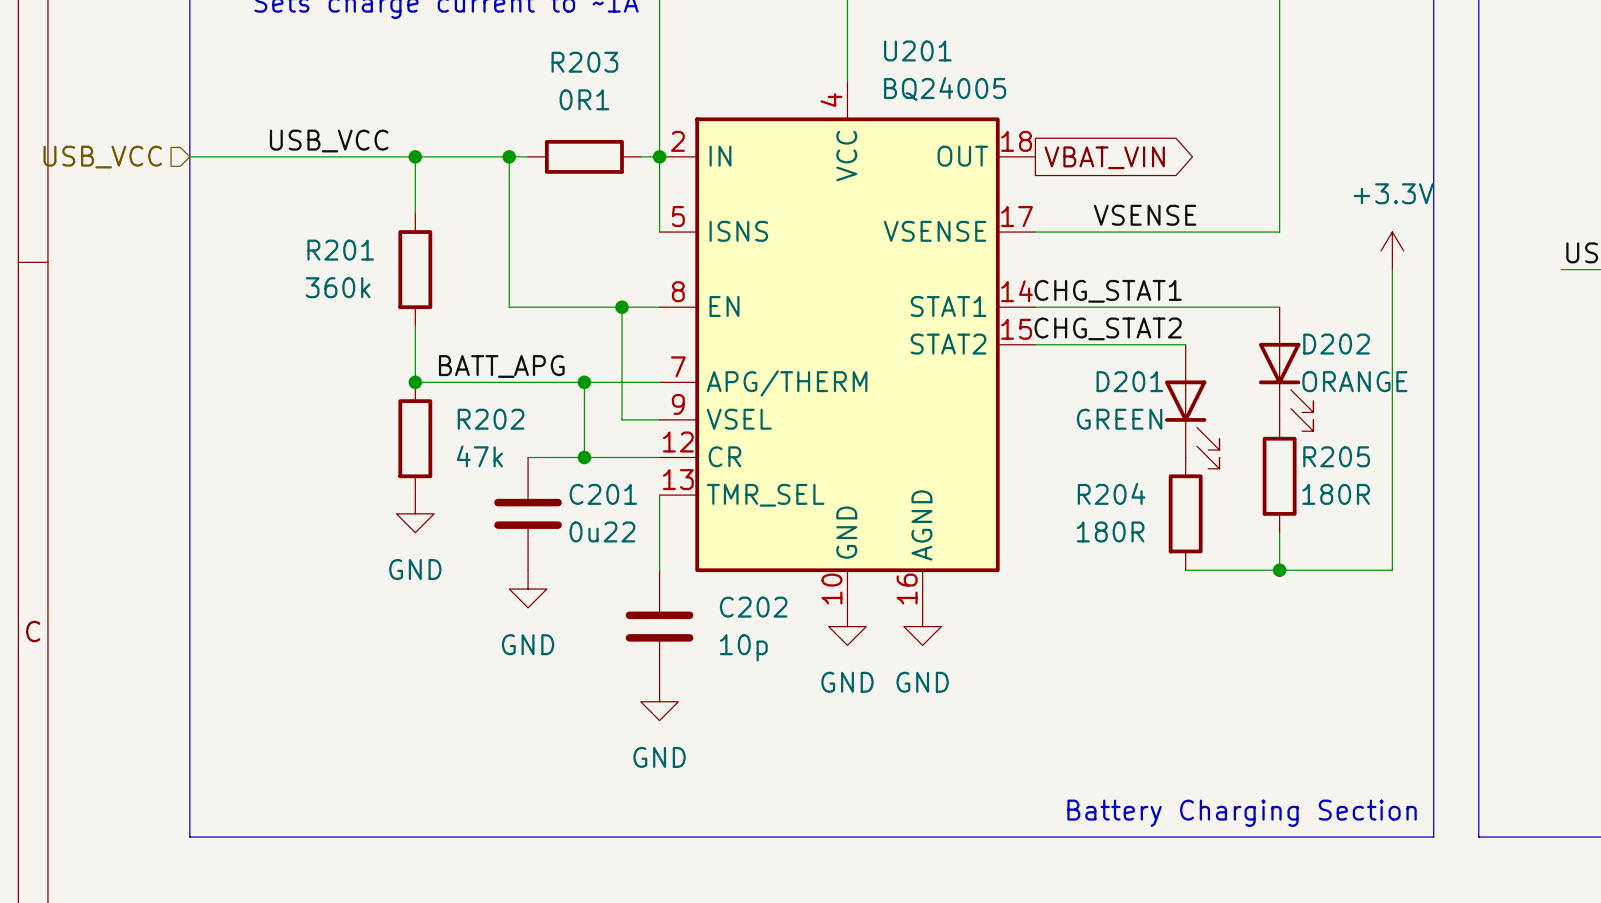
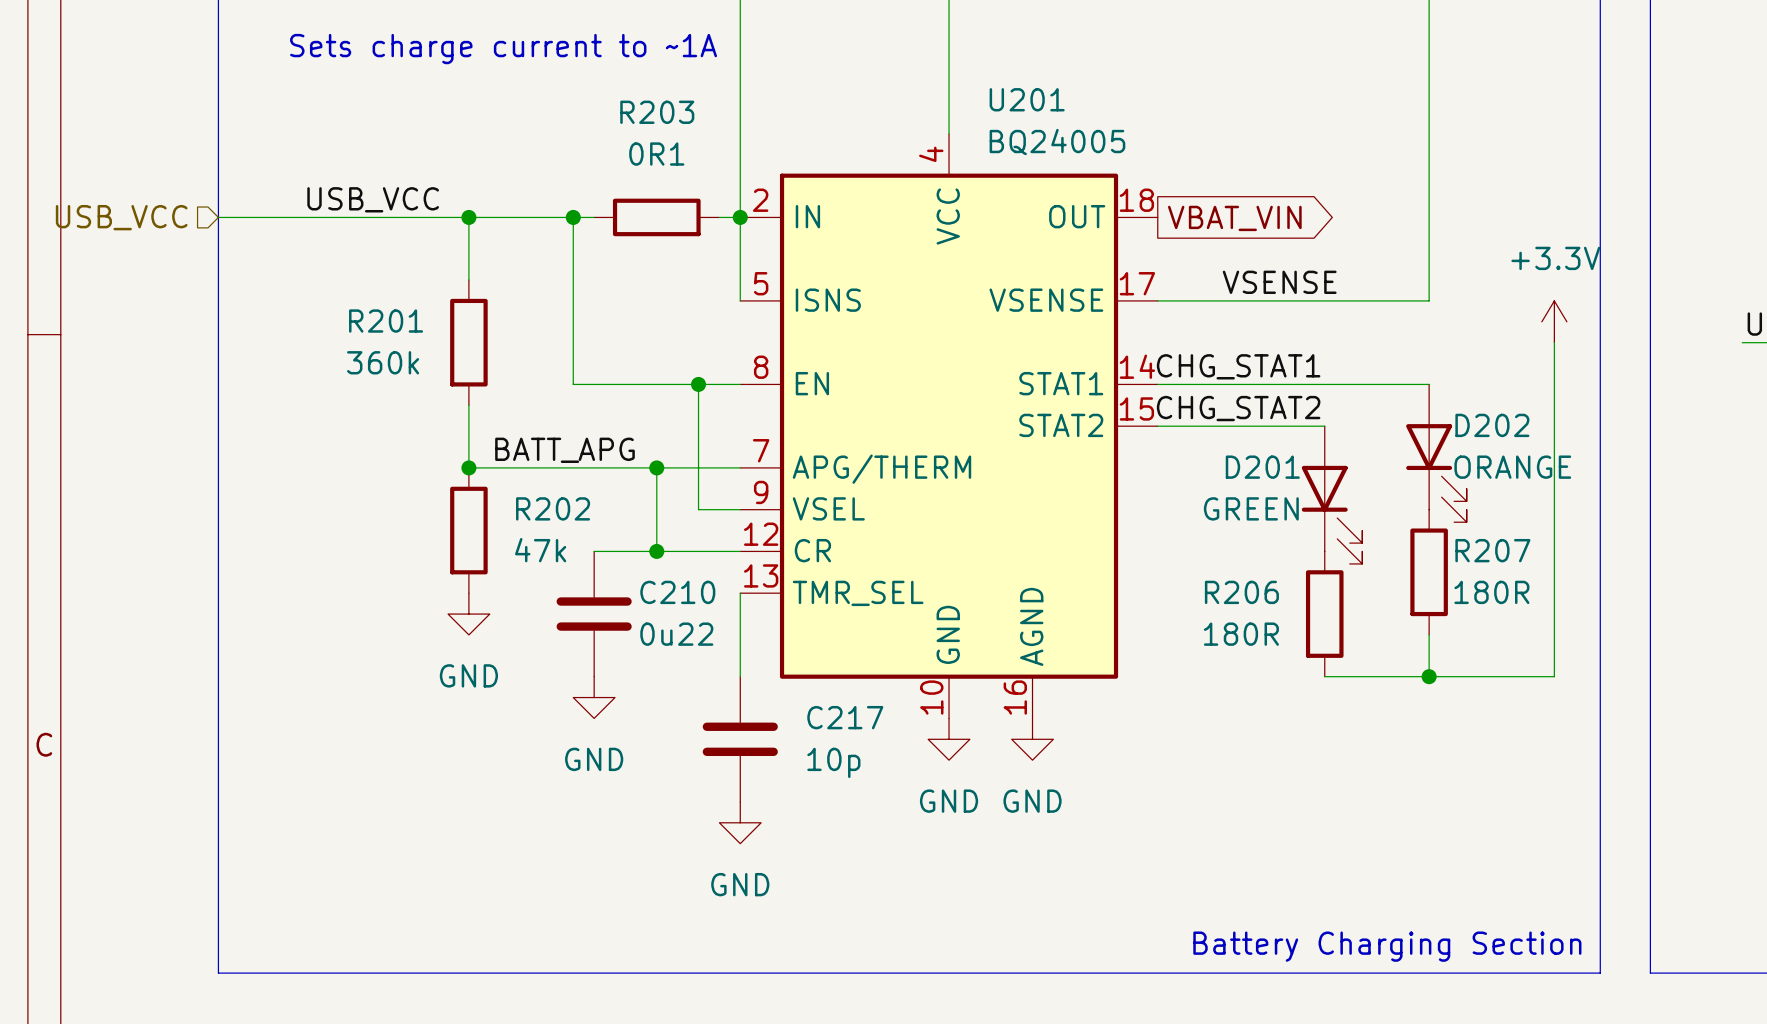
R205 name: R205 (1336, 456) -> R207 (1492, 550)
R204 name: R204 (1111, 493) -> R206 (1241, 592)
C201 name: C201 (603, 494) -> C210 (677, 592)
C202 name: C202 (753, 607) -> C217 (845, 717)

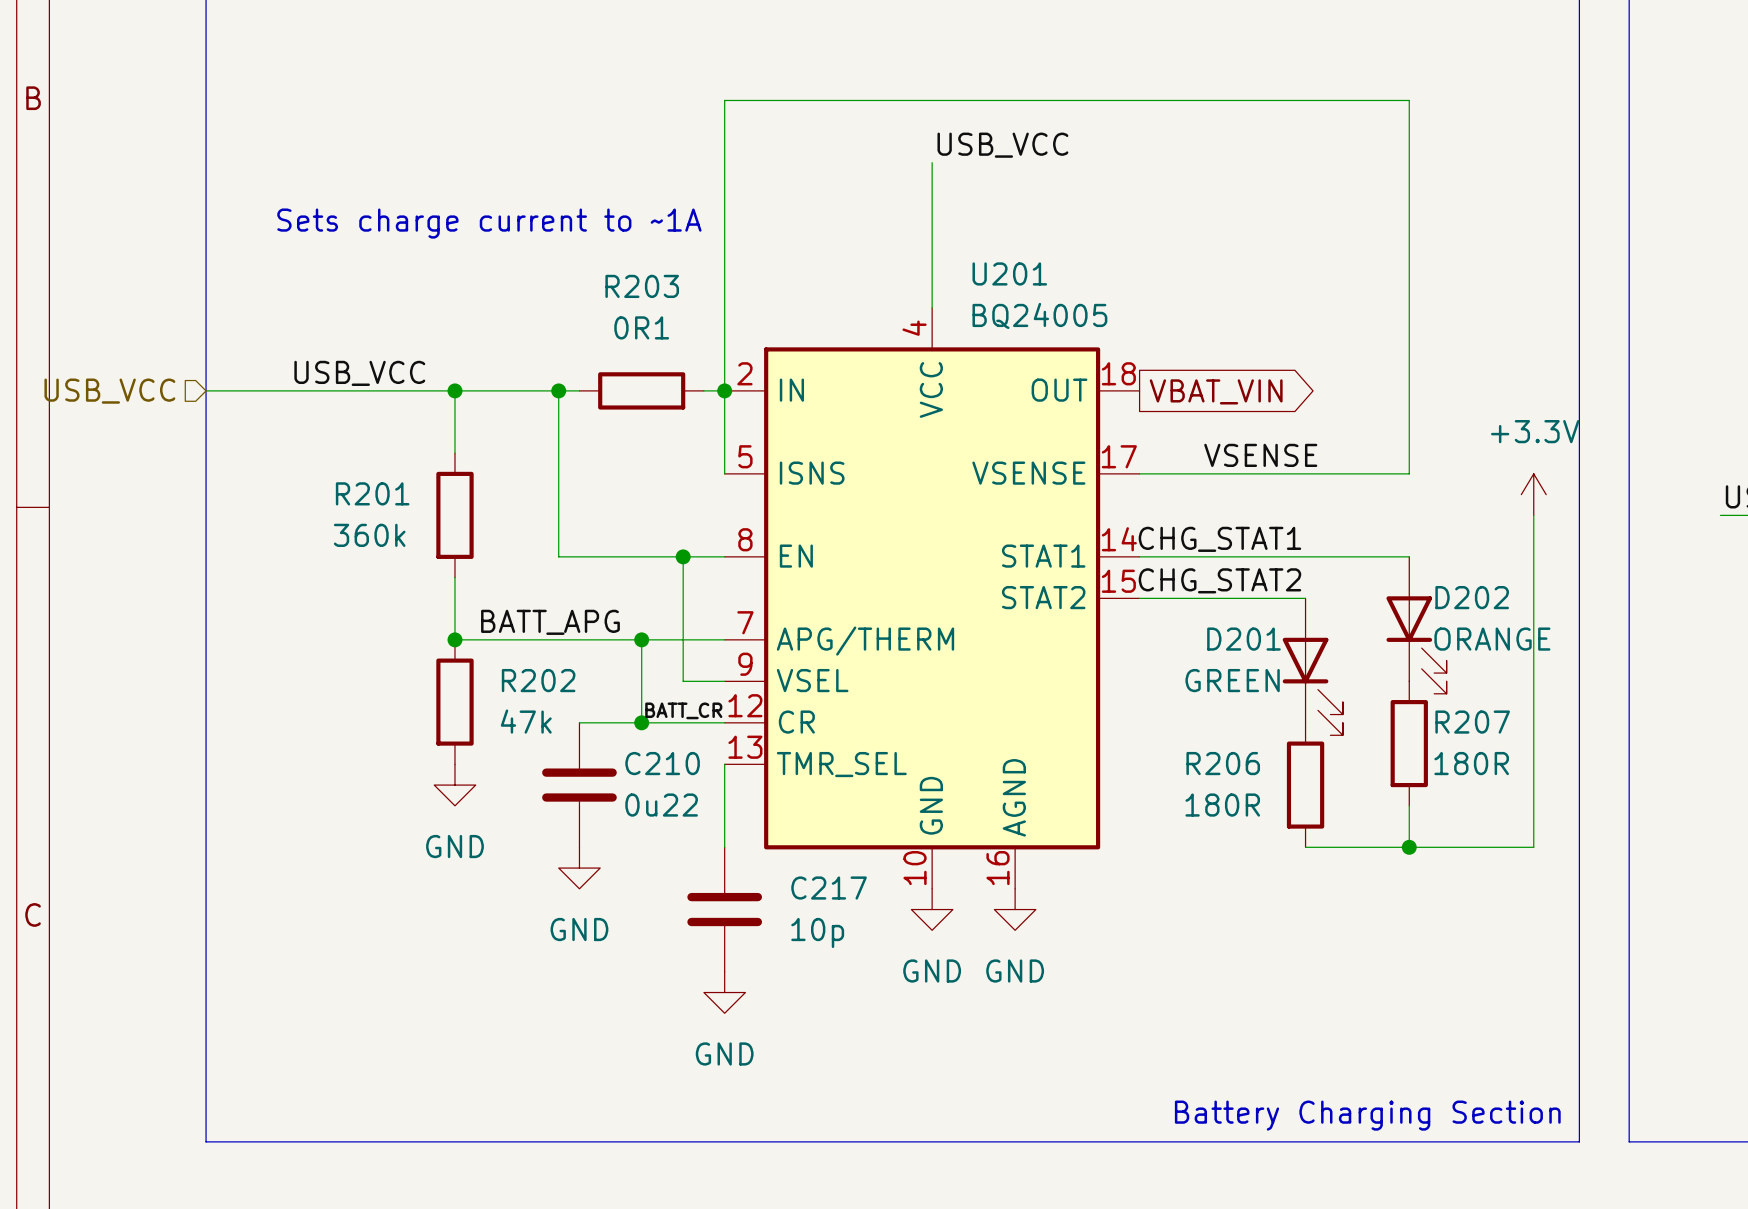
label: none -> BATT_CR (683, 710)

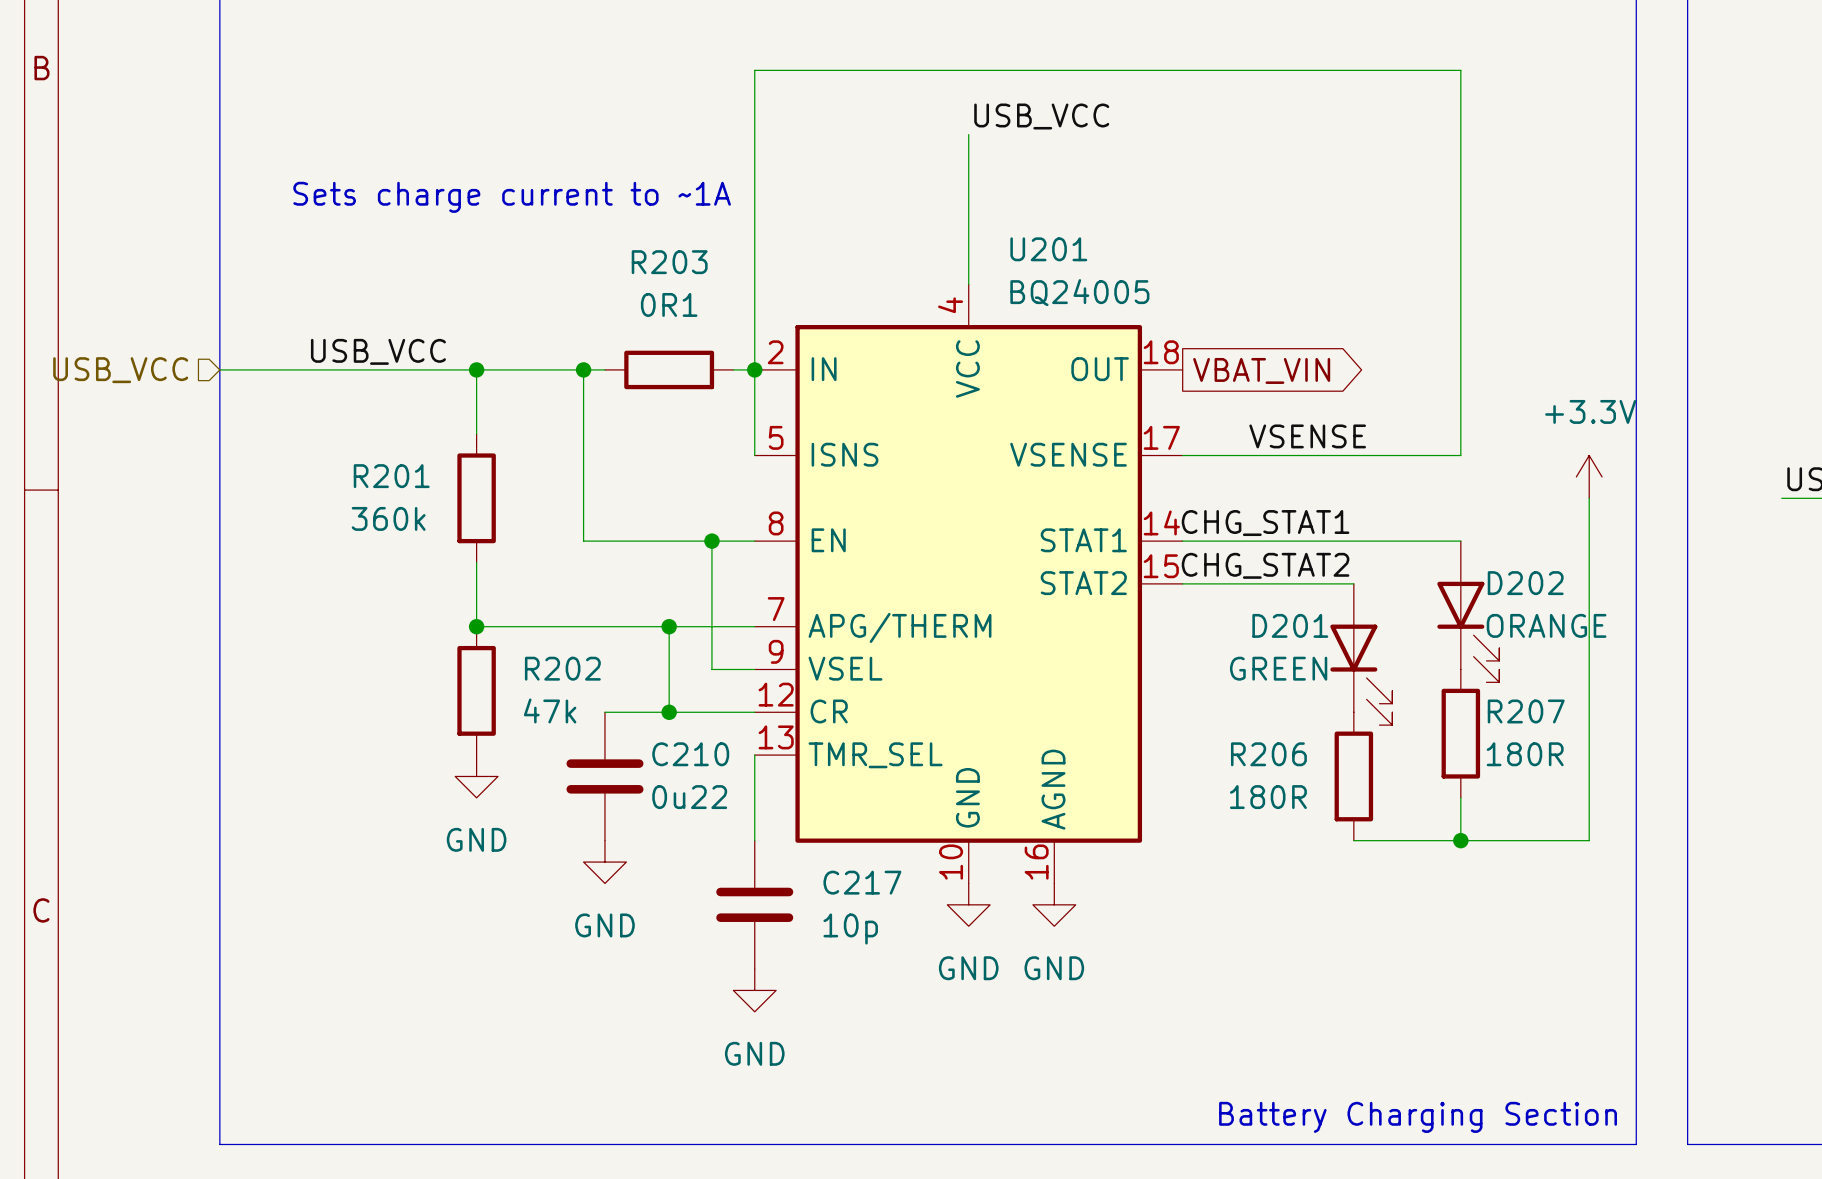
label: BATT_APG (550, 622) -> none
label: BATT_CR (683, 710) -> none

